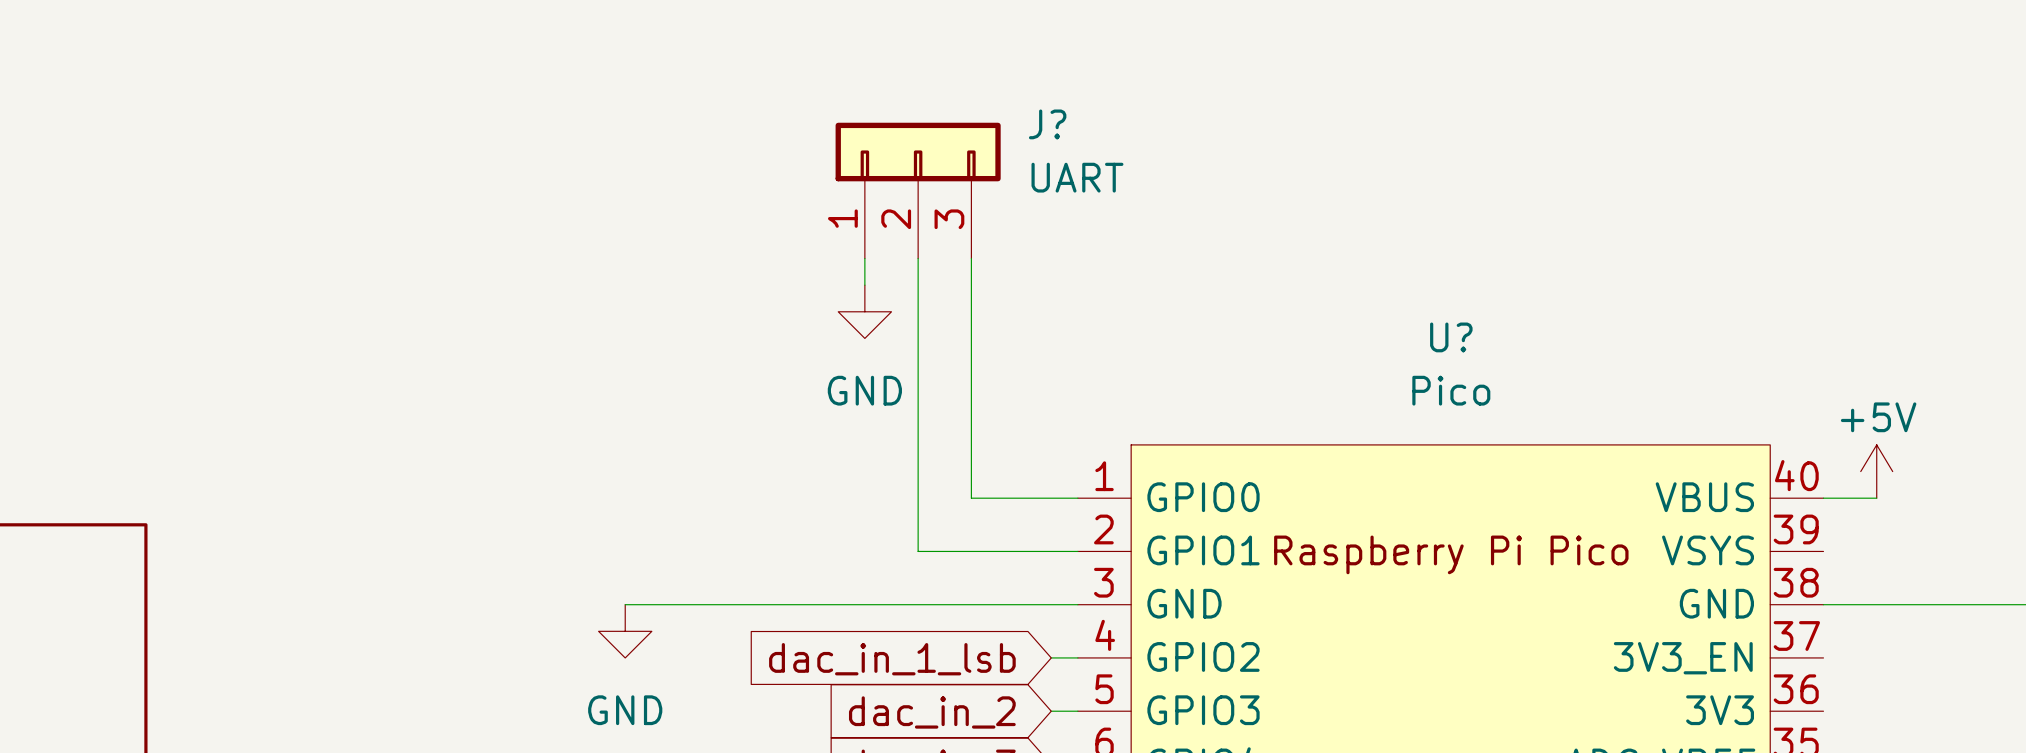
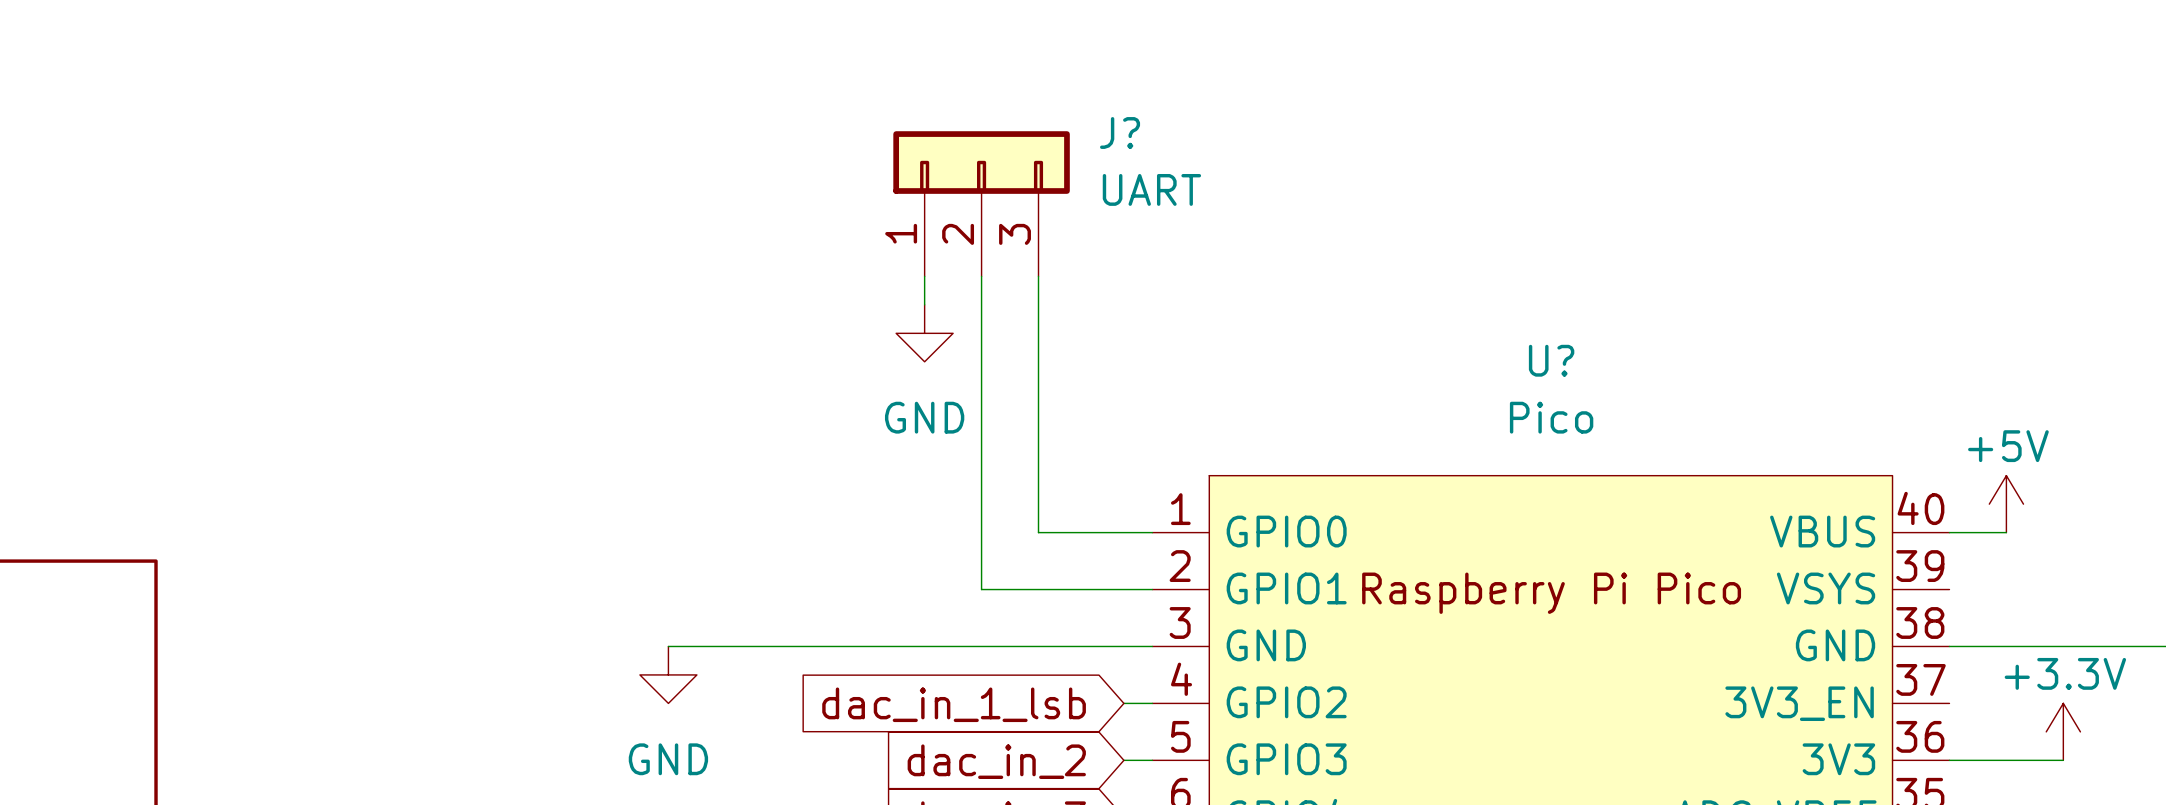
power symbol: none -> +3.3V (2063, 731)
wire: none -> (1949, 760) (2063, 760)

